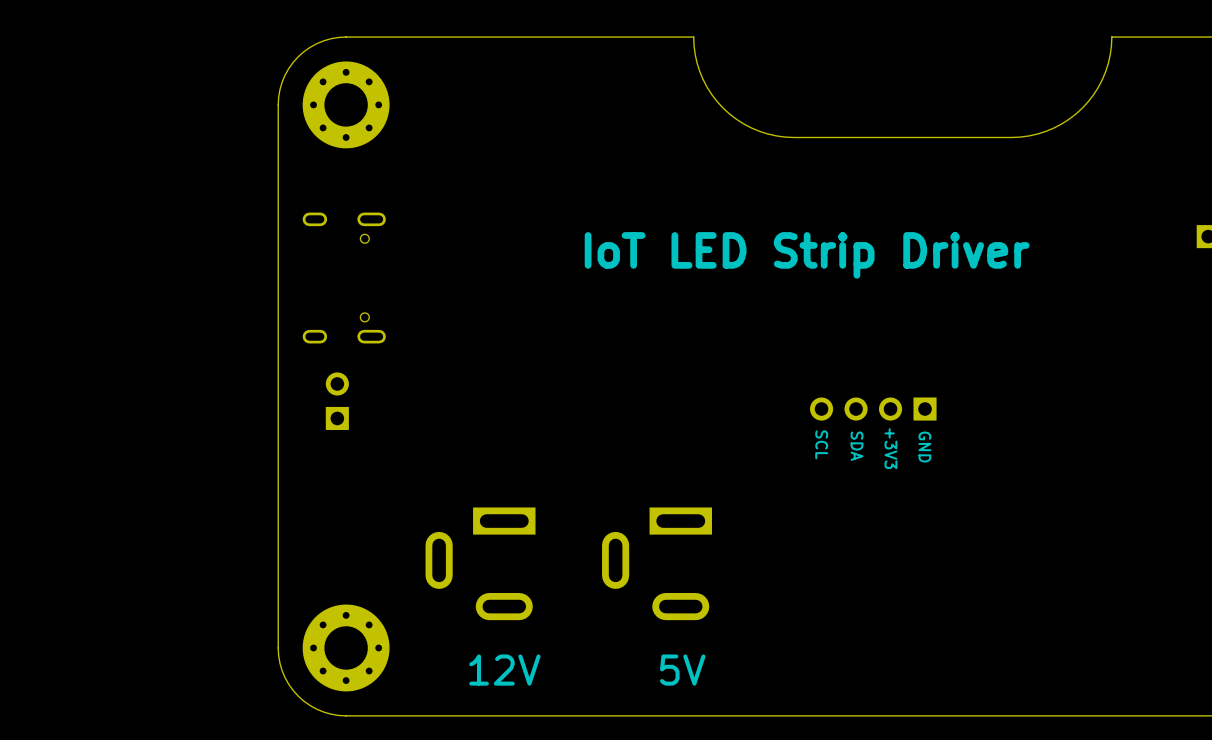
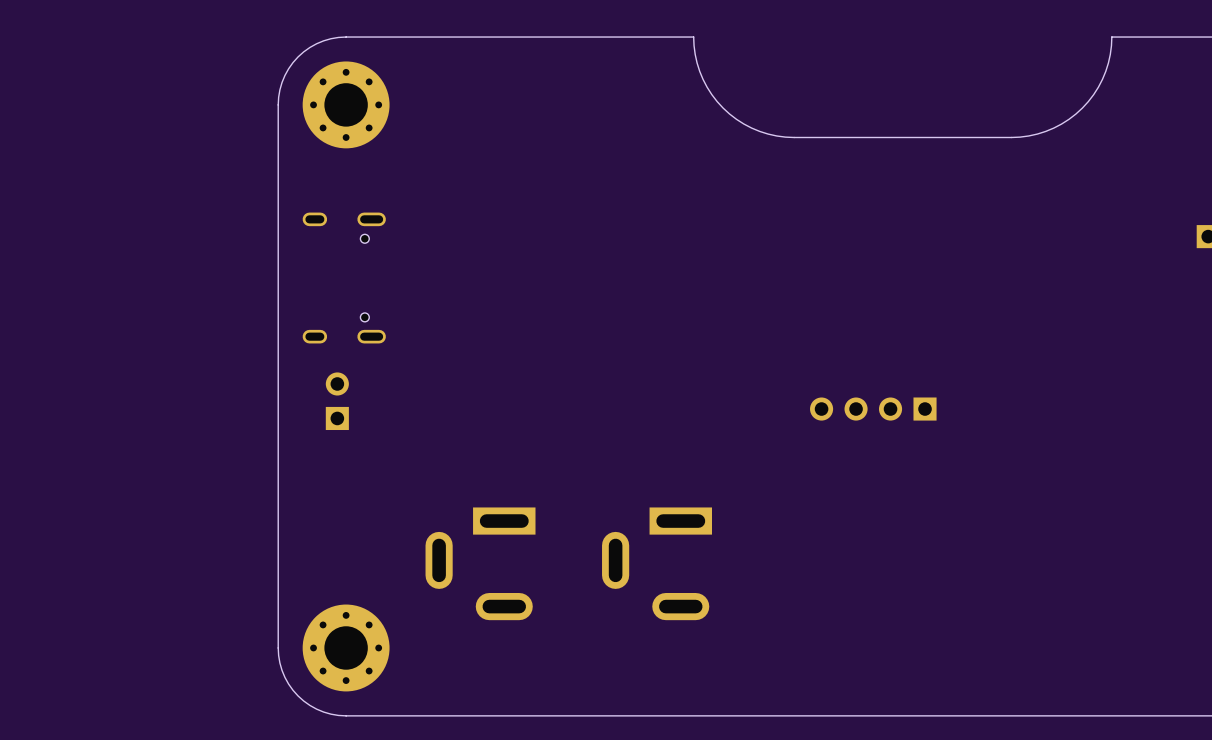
text: IoT LED Strip Driver (807, 255) -> none
text: SCL (821, 444) -> none
text: SDA (857, 446) -> none
text: GND (924, 447) -> none
text: +3V3 (890, 448) -> none
text: 12V (504, 670) -> none
text: 5V (682, 670) -> none

